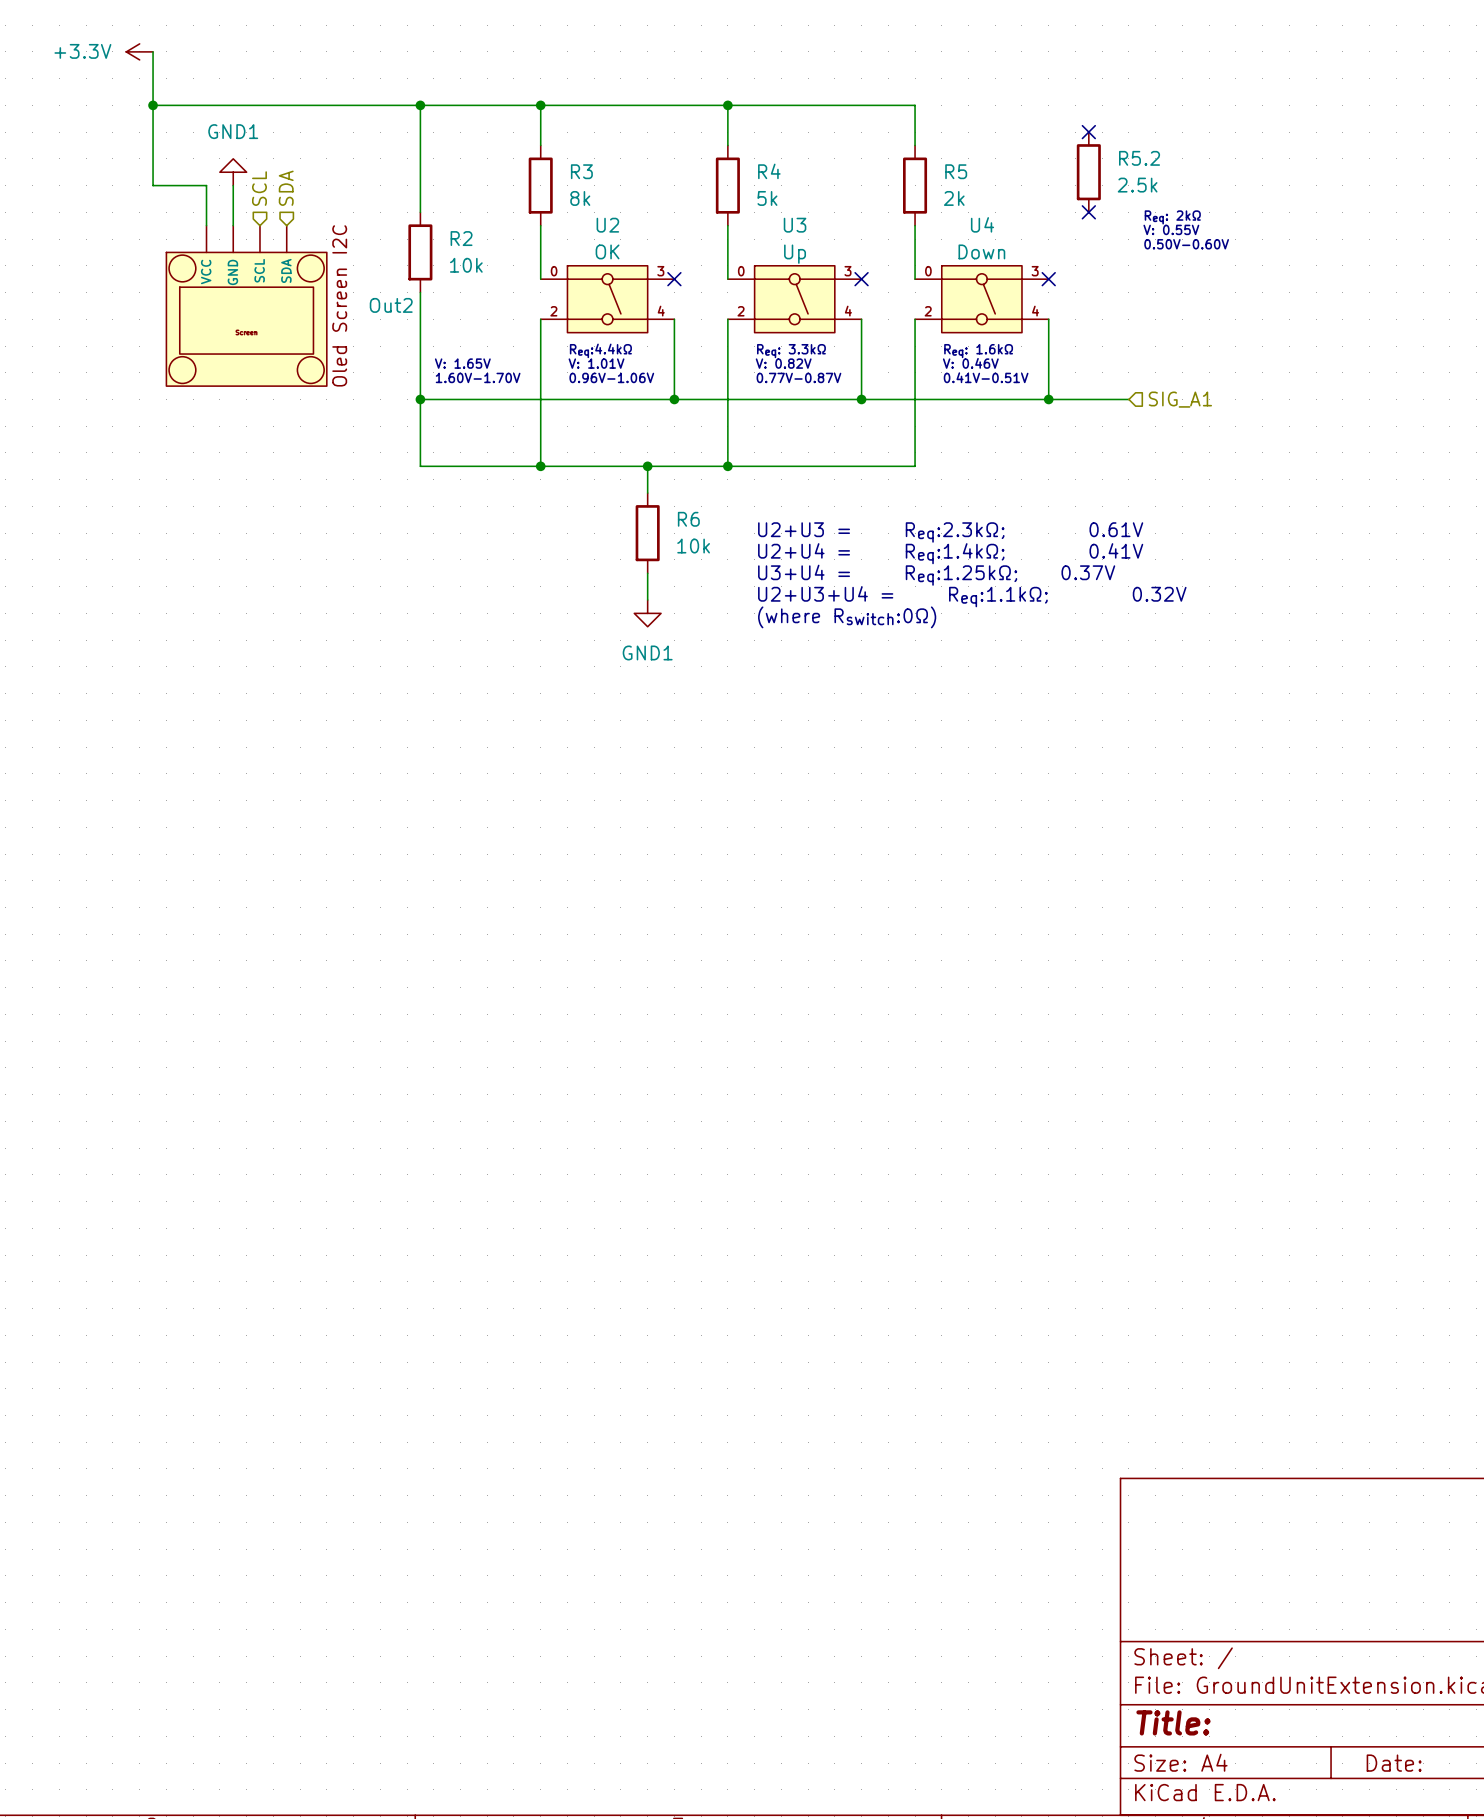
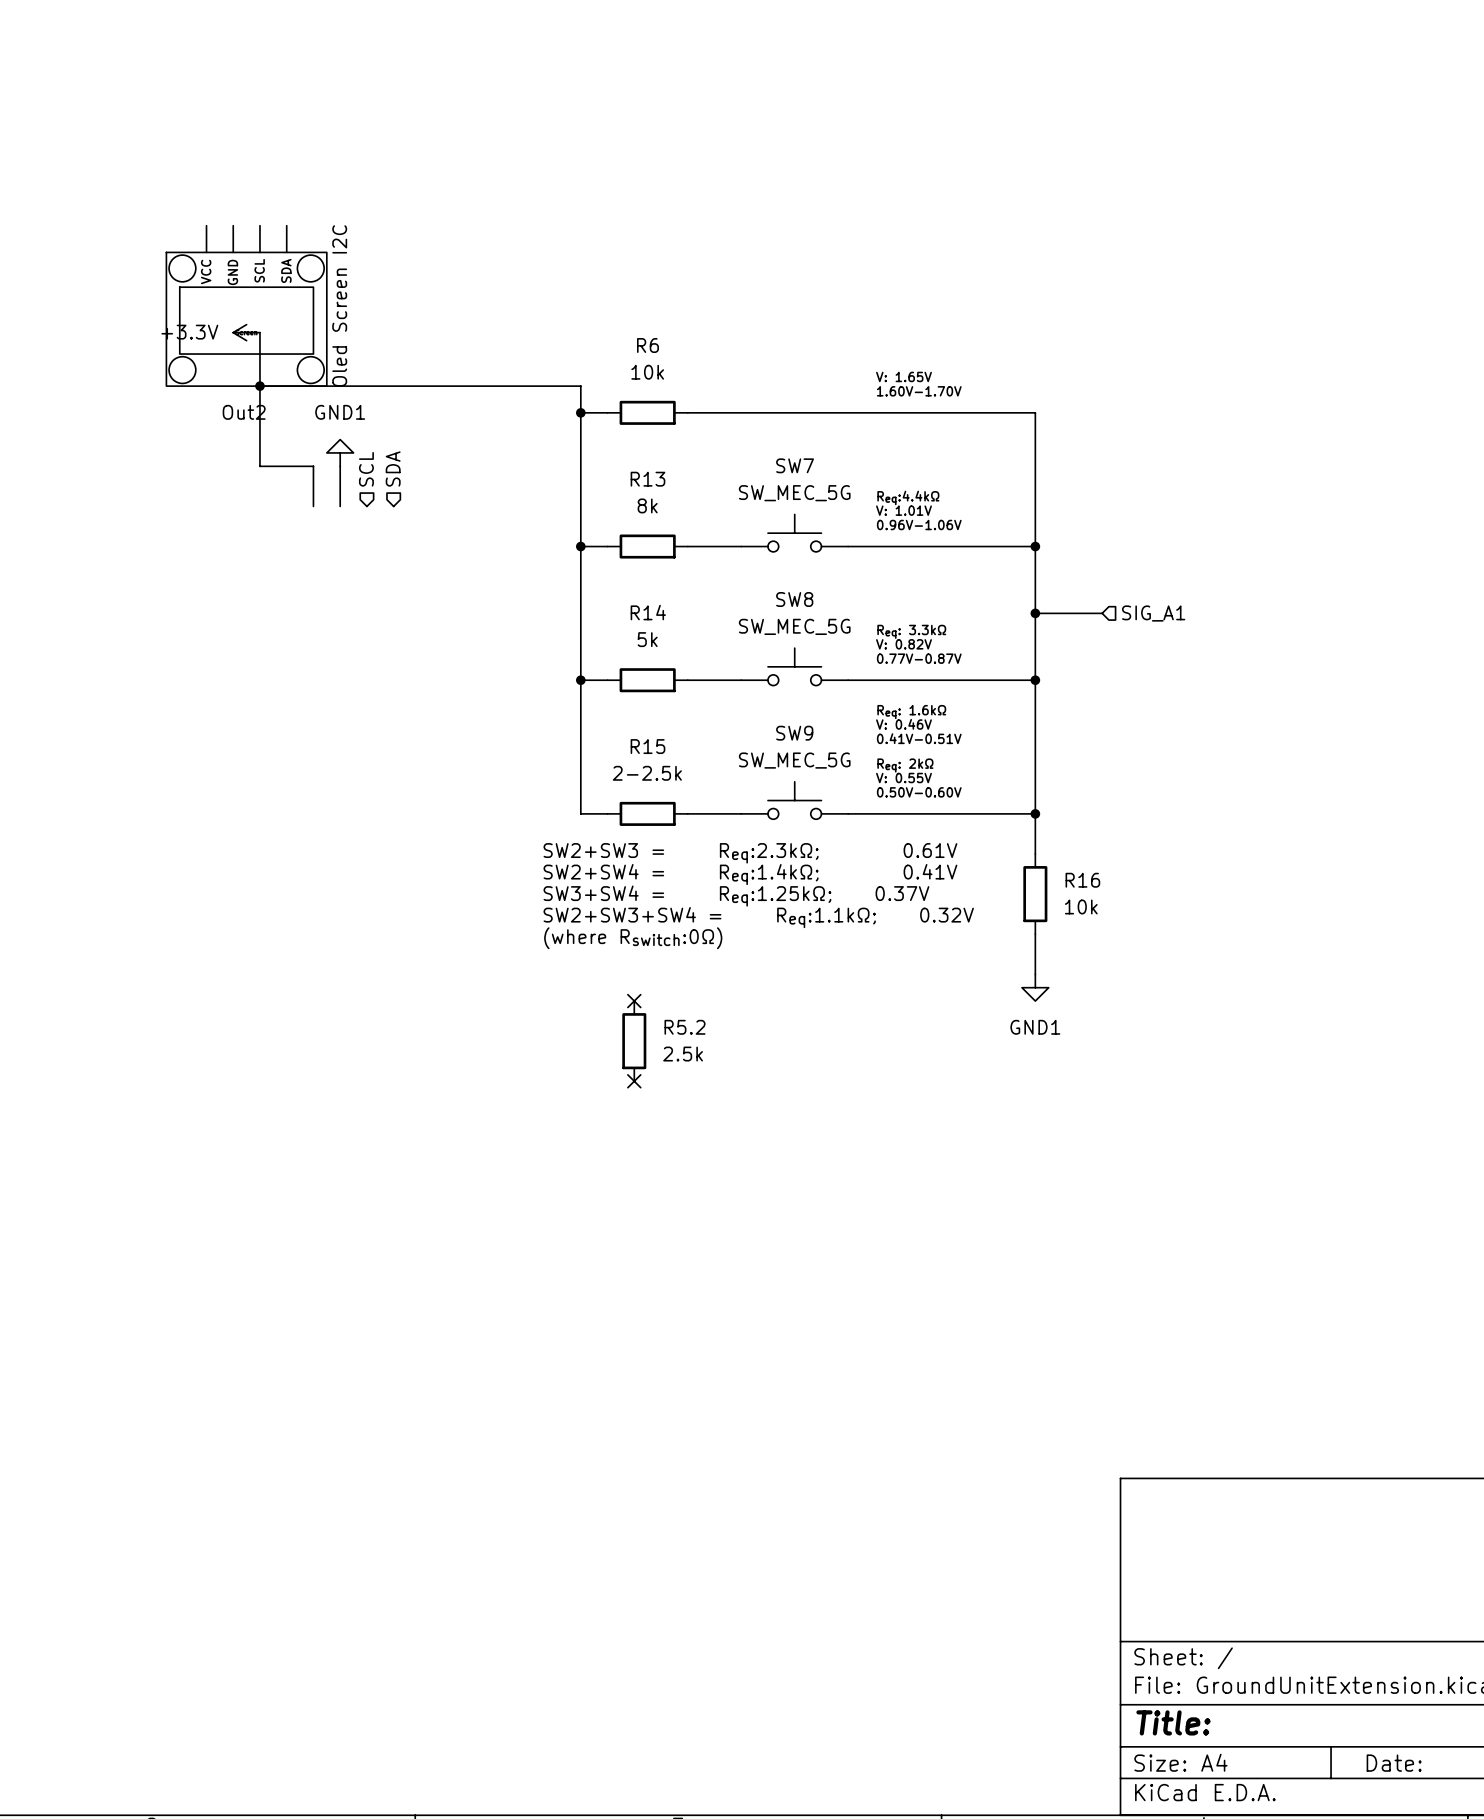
power symbol: +3.3V (139, 51) -> none
wire: (153, 51) (153, 185) (206, 185) (206, 225) -> none
wire: (153, 105) (915, 105) (915, 145) -> none
junction: (153, 105) -> none
wire: (420, 105) (420, 212) -> none
junction: (420, 105) -> none
wire: (540, 105) (540, 145) -> none
junction: (540, 105) -> none
wire: (727, 105) (727, 145) -> none
junction: (727, 105) -> none
no-connect mark: (1088, 132) -> none
power symbol: GND1 (233, 172) -> none
R5.2 position: (1088, 172) -> (634, 1041)
wire: (233, 185) (233, 225) -> none
R3: 8k (540, 185) -> none
R4: 5k (727, 185) -> none
R5: 2k (915, 185) -> none
hierarchical label: SCL (259, 188) -> none
hierarchical label: SDA (286, 188) -> none
no-connect mark: (1088, 212) -> none
text: Req: 2kΩ (1172, 217) -> none
wire: (540, 225) (540, 279) -> none
wire: (727, 225) (727, 279) -> none
wire: (915, 225) (915, 279) -> none
text: V: 0.55V (1171, 229) -> none
text: 0.50V-0.60V (1186, 244) -> none
R2: 10k (420, 252) -> none
no-connect mark: (674, 279) -> none
no-connect mark: (861, 279) -> none
no-connect mark: (1048, 279) -> none
wire: (420, 292) (420, 466) (915, 466) (915, 319) -> none
U2: OK (607, 299) -> none
U3: Up (794, 299) -> none
U4: Down (981, 299) -> none
Out2 name position: Out2 (391, 305) -> Out2 (244, 412)
wire: (540, 319) (540, 466) -> none
wire: (674, 319) (674, 399) -> none
wire: (727, 319) (727, 466) -> none
wire: (861, 319) (861, 399) -> none
wire: (1048, 319) (1048, 399) -> none
power symbol: none -> +3.3V (246, 332)
wire: none -> (259, 332) (259, 466) (313, 466) (313, 506)
text: Req:4.4kΩ (600, 350) -> none
text: Req: 3.3kΩ (791, 351) -> none
text: Req: 1.6kΩ (978, 351) -> none
text: V: 1.65V (462, 363) -> none
text: V: 1.01V (596, 363) -> none
text: V: 0.82V (783, 363) -> none
text: V: 0.46V (970, 363) -> V: 1.65V (904, 376)
text: 1.60V-1.70V (478, 377) -> none
text: 0.96V-1.06V (611, 377) -> none
text: 0.77V-0.87V (798, 377) -> none
text: 0.41V-0.51V (986, 377) -> none
wire: none -> (259, 386) (580, 386) (580, 813) (607, 813)
junction: none -> (259, 386)
text: none -> 1.60V-1.70V (919, 391)
wire: (420, 399) (1128, 399) -> none
junction: (420, 399) -> none
junction: (674, 399) -> none
junction: (861, 399) -> none
junction: (1048, 399) -> none
hierarchical label position: SIG_A1 (1180, 399) -> SIG_A1 (1153, 613)
wire: none -> (580, 412) (607, 412)
junction: none -> (580, 412)
wire: none -> (687, 412) (1035, 412) (1035, 854)
power symbol: none -> GND1 (340, 452)
wire: none -> (340, 466) (340, 506)
junction: (540, 466) -> none
junction: (647, 466) -> none
junction: (727, 466) -> none
hierarchical label: none -> SDA (393, 468)
hierarchical label: none -> SCL (366, 469)
text: none -> Req:4.4kΩ (908, 497)
text: none -> V: 1.01V (904, 510)
R6 name position: R6 (688, 519) -> R6 (647, 345)
text: none -> 0.96V-1.06V (919, 524)
text: U2+U3 = Req:2.3kΩ; 0.61V (950, 532) -> none
R6 rotation: 0° (647, 533) -> 90° clockwise (647, 412)
R6 position: (647, 533) -> (647, 412)
SW7: none -> SW_MEC_5G (794, 533)
wire: none -> (580, 546) (607, 546)
junction: none -> (580, 546)
R13: none -> 8k (647, 546)
wire: none -> (687, 546) (741, 546)
R6 value position: 10k (693, 546) -> 10k (647, 372)
wire: none -> (848, 546) (1035, 546)
junction: none -> (1035, 546)
text: U2+U4 = Req:1.4kΩ; 0.41V (950, 553) -> none
wire: (647, 573) (647, 600) -> none
text: U3+U4 = Req:1.25kΩ; 0.37V (936, 575) -> none
text: U2+U3+U4 = Req:1.1kΩ; 0.32V (972, 596) -> none
power symbol: GND1 (647, 613) -> none
wire: none -> (1035, 613) (1102, 613)
junction: none -> (1035, 613)
text: (where Rswitch:0Ω) (847, 617) -> none
text: none -> Req: 3.3kΩ (911, 631)
text: none -> V: 0.82V (904, 644)
text: none -> 0.77V-0.87V (919, 658)
SW8: none -> SW_MEC_5G (794, 666)
wire: none -> (580, 680) (607, 680)
junction: none -> (580, 680)
R14: none -> 5k (647, 680)
wire: none -> (687, 680) (741, 680)
wire: none -> (848, 680) (1035, 680)
junction: none -> (1035, 680)
text: none -> Req: 1.6kΩ (911, 712)
text: none -> V: 0.46V (904, 724)
text: none -> 0.41V-0.51V (919, 738)
text: none -> Req: 2kΩ (905, 765)
text: none -> V: 0.55V (904, 778)
text: none -> 0.50V-0.60V (919, 792)
SW9: none -> SW_MEC_5G (794, 800)
R15: none -> 2-2.5k (647, 813)
wire: none -> (687, 813) (741, 813)
wire: none -> (848, 813) (1035, 813)
junction: none -> (1035, 813)
text: none -> SW2+SW3 = Req:2.3kΩ; 0.61V (750, 853)
text: none -> SW2+SW4 = Req:1.4kΩ; 0.41V (750, 874)
R16: none -> 10k (1035, 894)
text: none -> SW3+SW4 = Req:1.25kΩ; 0.37V (736, 896)
text: none -> SW2+SW3+SW4 = Req:1.1kΩ; 0.32V (758, 917)
wire: none -> (1035, 934) (1035, 974)
text: none -> (where Rswitch:0Ω) (633, 938)
power symbol: none -> GND1 (1035, 987)
no-connect mark: none -> (634, 1001)
no-connect mark: none -> (634, 1081)

